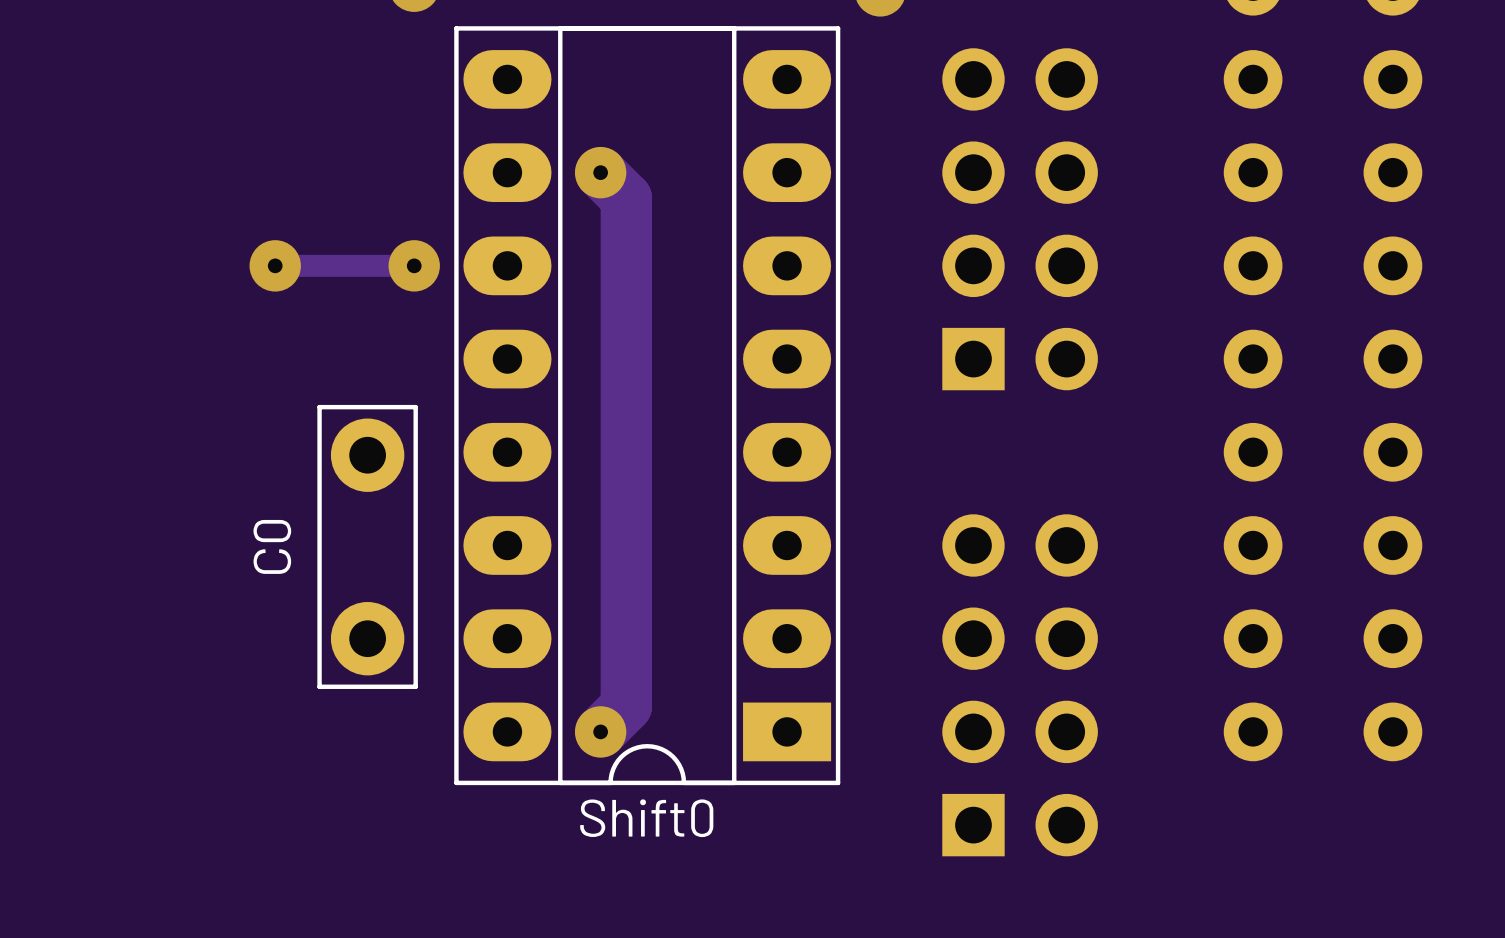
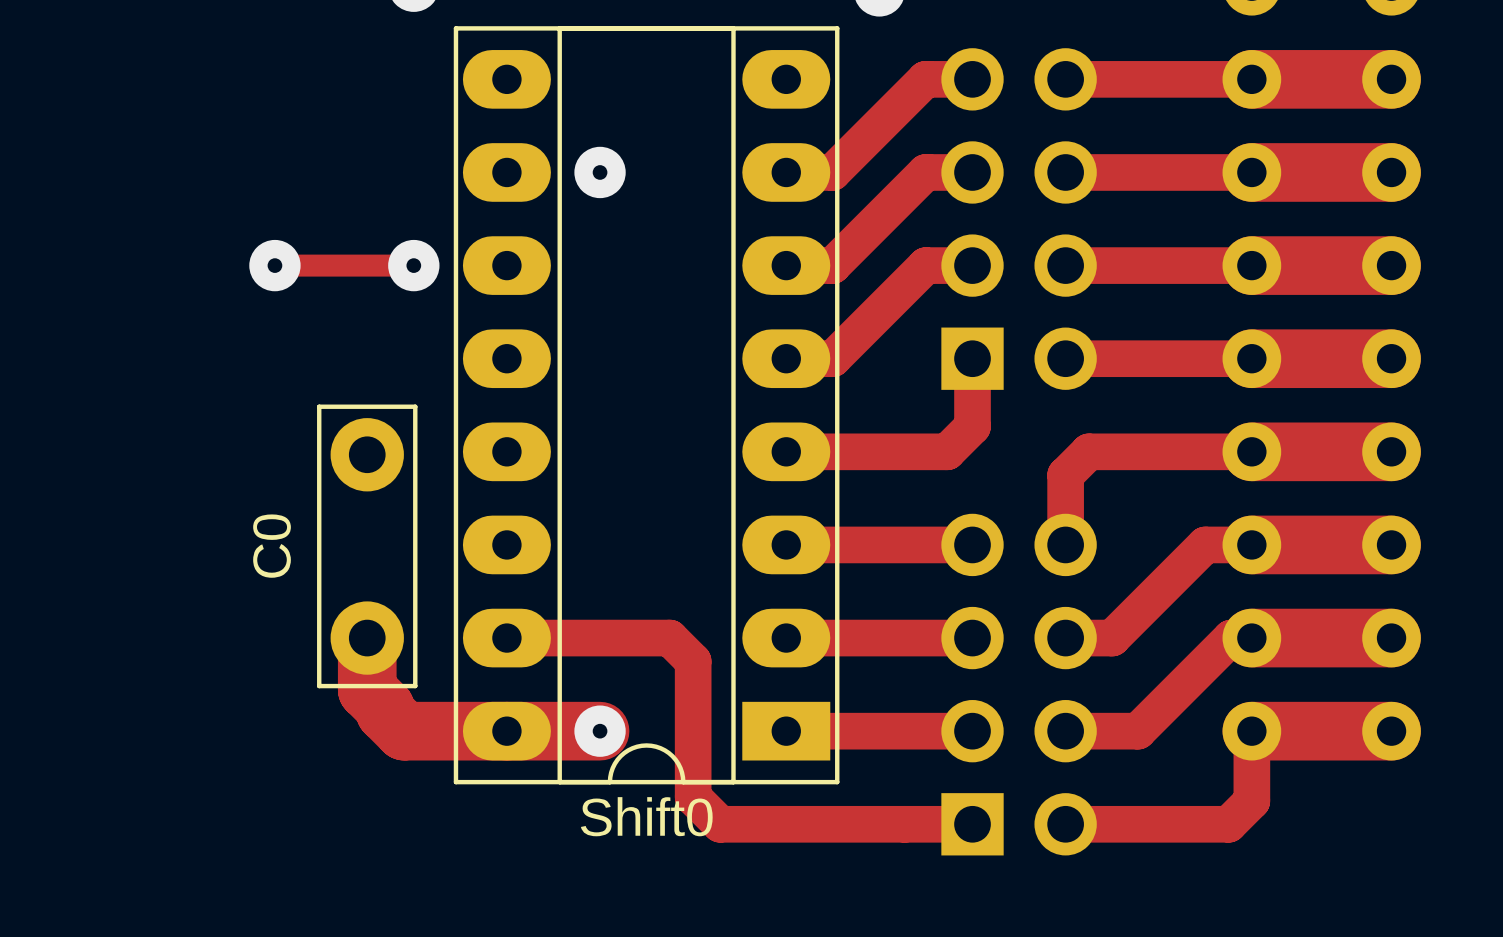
track: none -> (972, 79) (925, 79) (832, 172) (786, 172)
track: none -> (1065, 79) (1391, 79)
track: (600, 172) (626, 198) (626, 706) (600, 731) -> (367, 638) (367, 689) (404, 731) (600, 731)
track: none -> (972, 172) (925, 172) (832, 265) (786, 265)
track: none -> (1065, 172) (1391, 172)
track: none -> (972, 265) (925, 265) (832, 358) (786, 358)
track: none -> (1065, 265) (1391, 265)
track: none -> (972, 358) (972, 426) (947, 451) (786, 451)
track: none -> (1065, 358) (1391, 358)
track: none -> (1391, 451) (1088, 451) (1065, 475) (1065, 544)
track: none -> (786, 544) (972, 544)
track: none -> (1391, 544) (1205, 544) (1112, 638) (1065, 638)
track: none -> (506, 638) (669, 638) (693, 661) (693, 797) (720, 824) (972, 824)
track: none -> (786, 638) (972, 638)
track: none -> (1391, 638) (1231, 638) (1137, 731) (1065, 731)
track: none -> (786, 731) (972, 731)
track: none -> (1391, 731) (1251, 731) (1251, 801) (1228, 824) (1065, 824)

